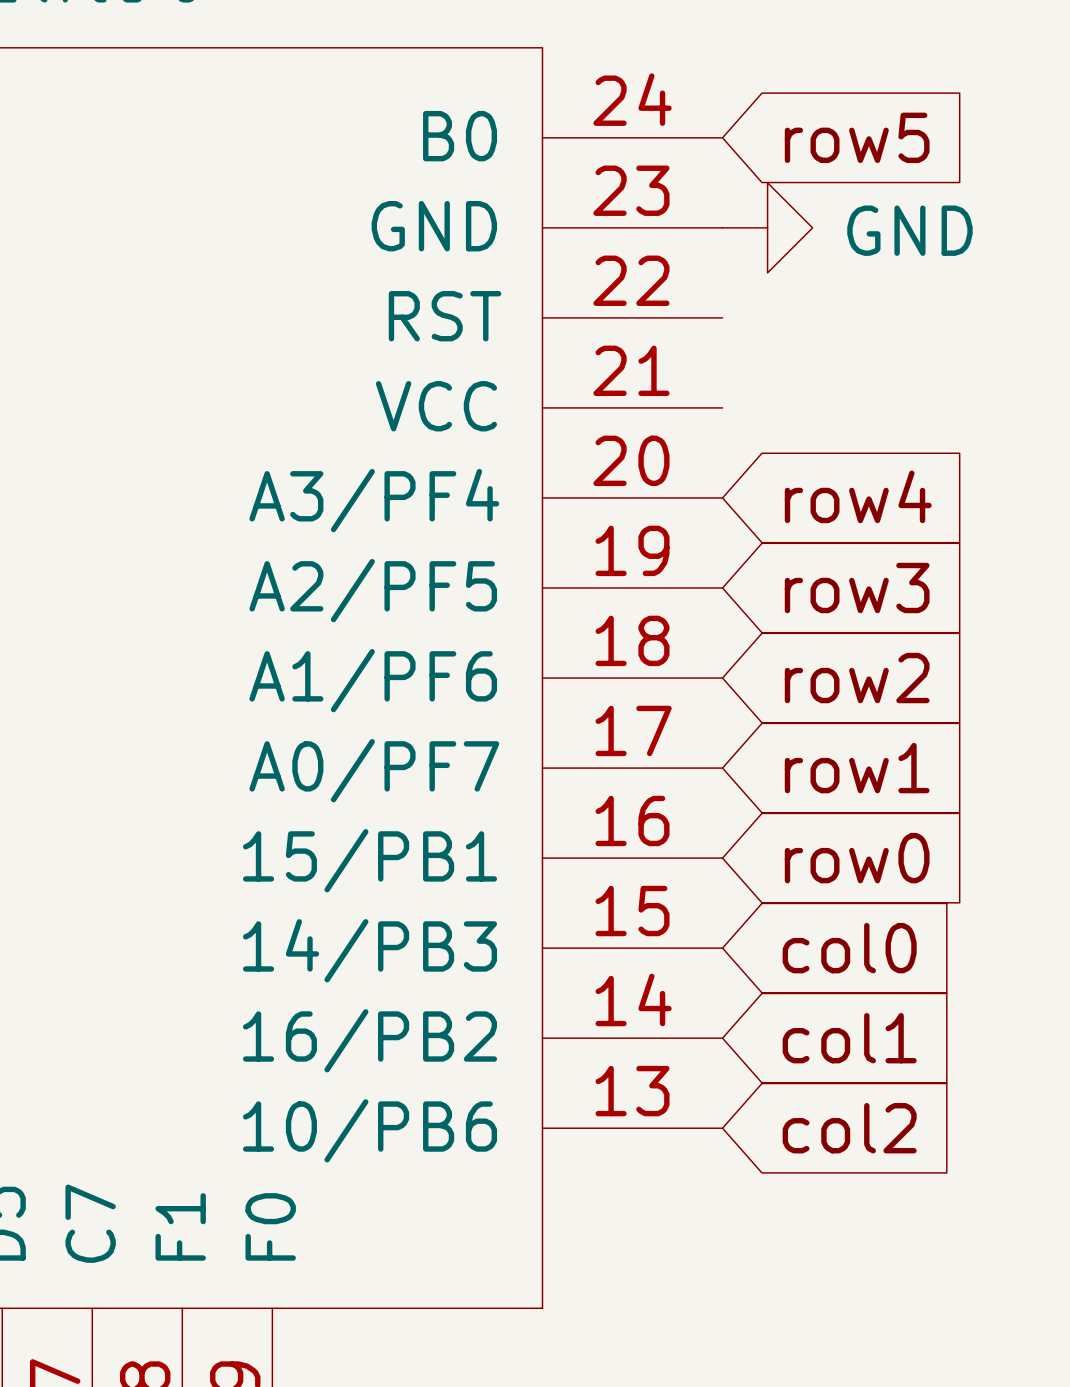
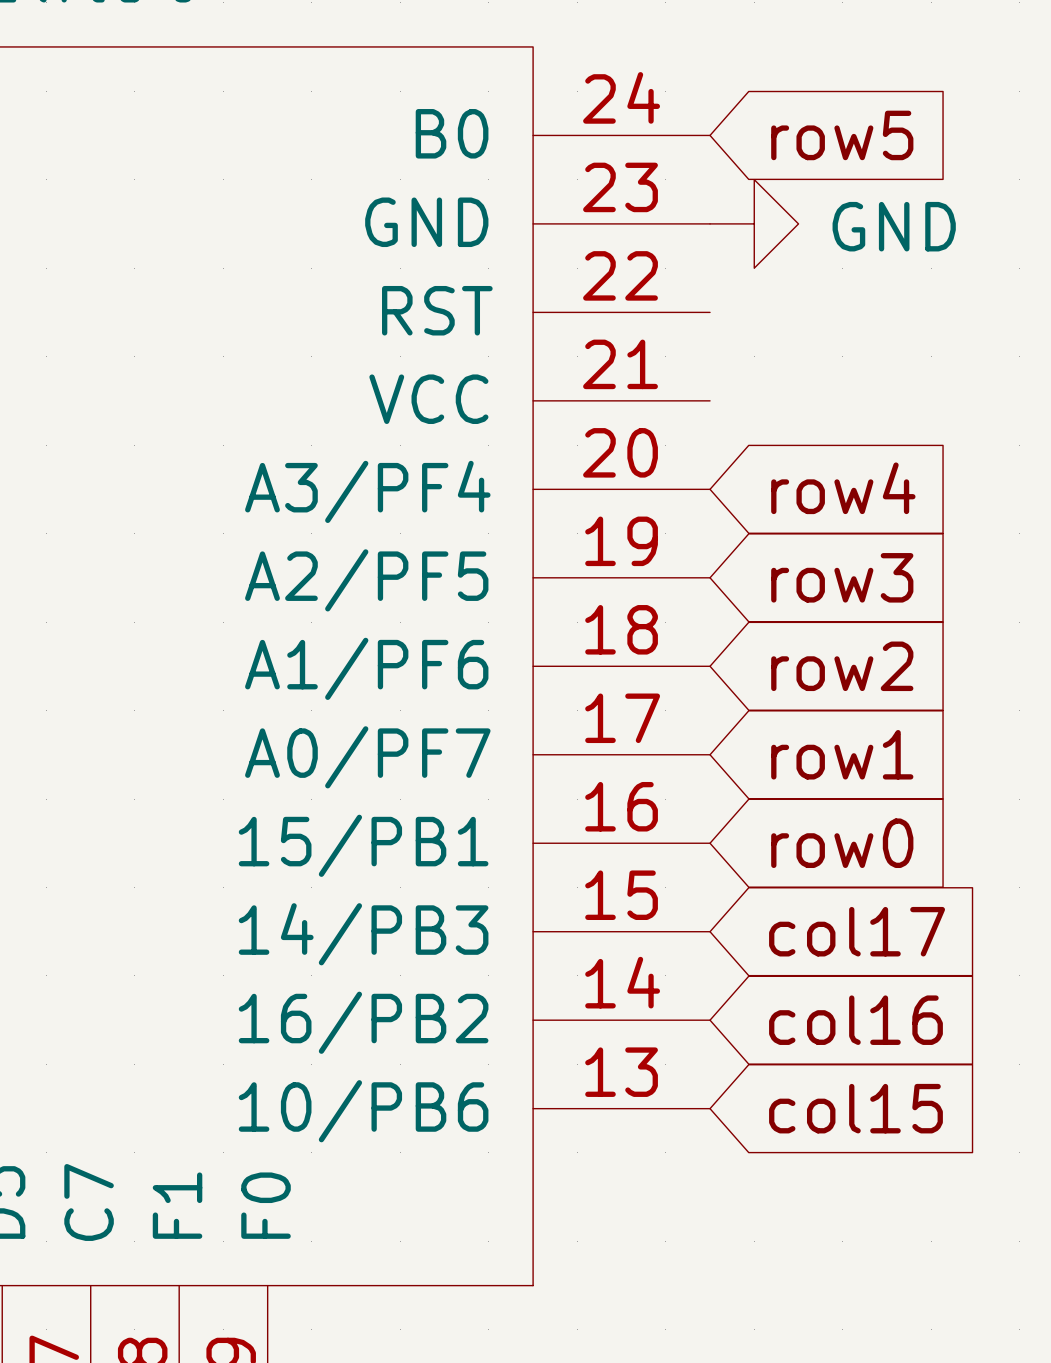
global label: col0 (849, 948) -> col17 (857, 931)
global label: col1 (849, 1038) -> col16 (855, 1020)
global label: col2 (849, 1128) -> col15 (855, 1108)

